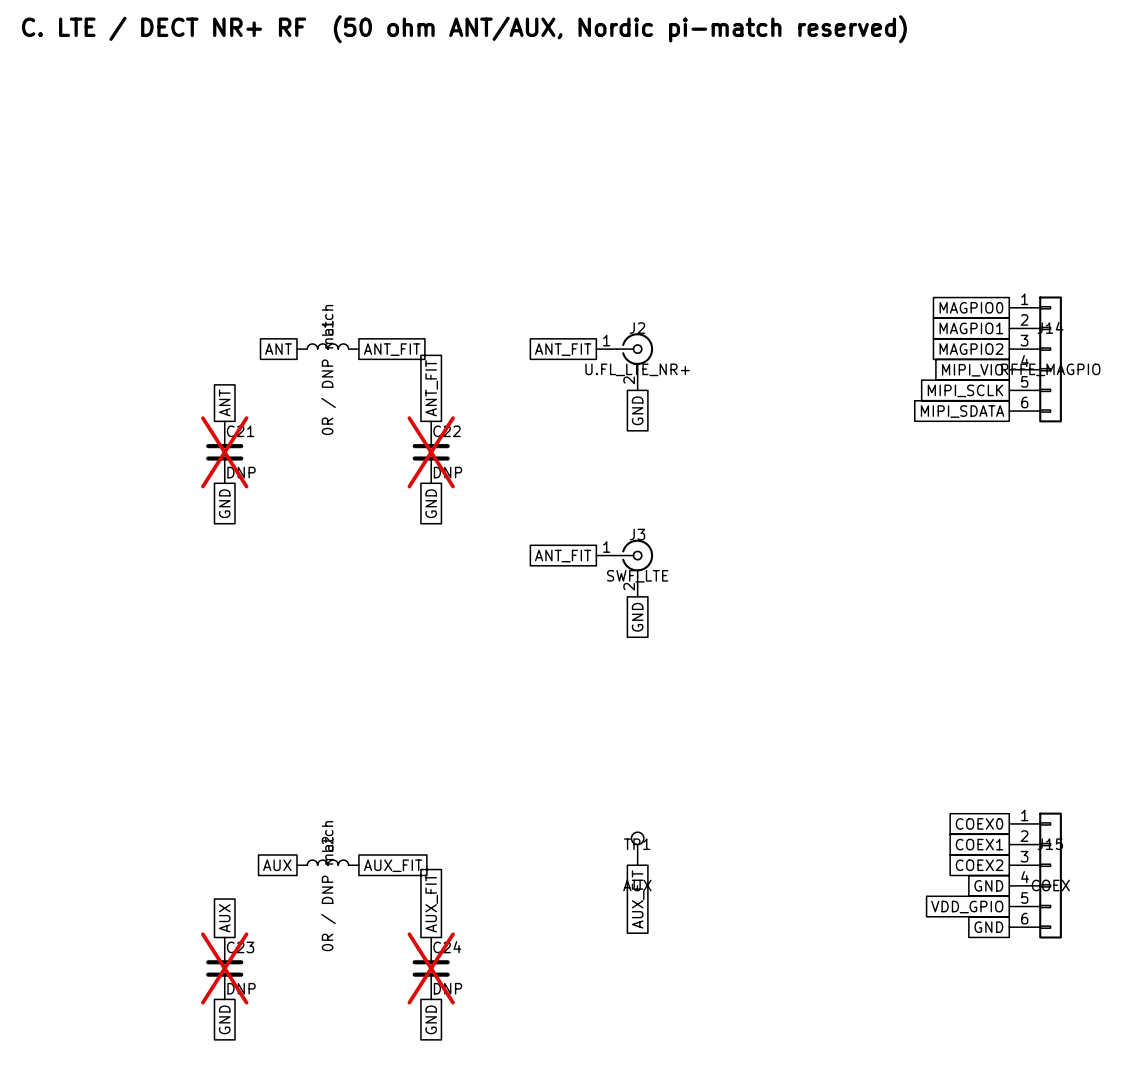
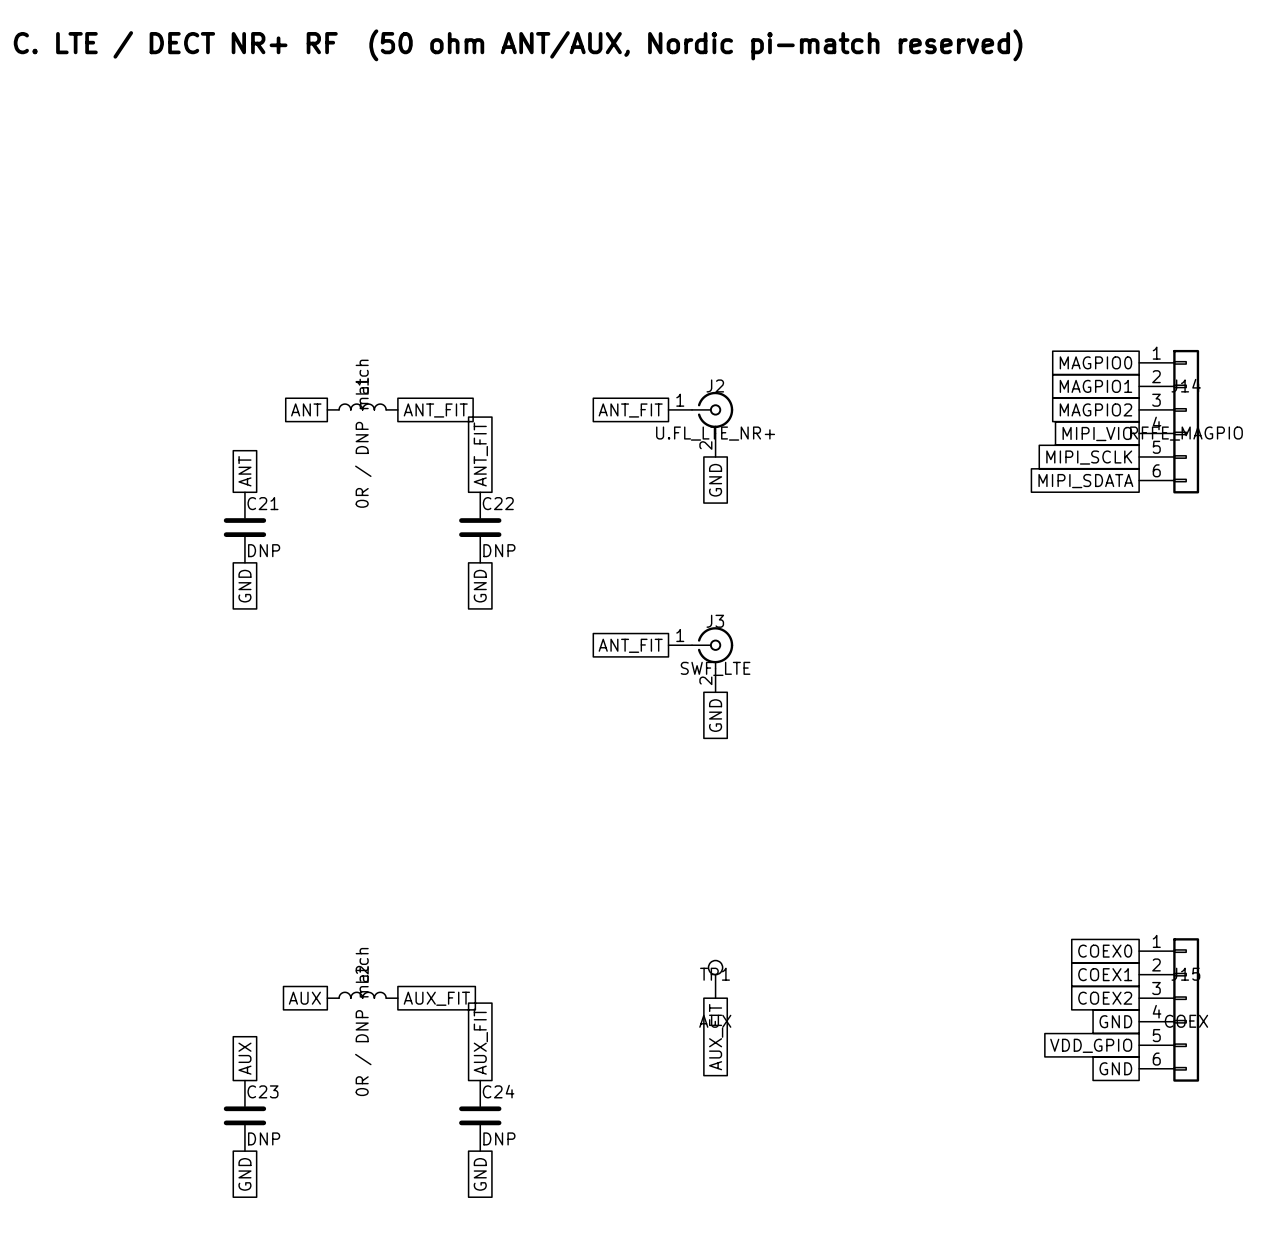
C21 do-not-place cross: (224, 452) -> none
C22 do-not-place cross: (431, 452) -> none
C23 do-not-place cross: (224, 968) -> none
C24 do-not-place cross: (431, 968) -> none

